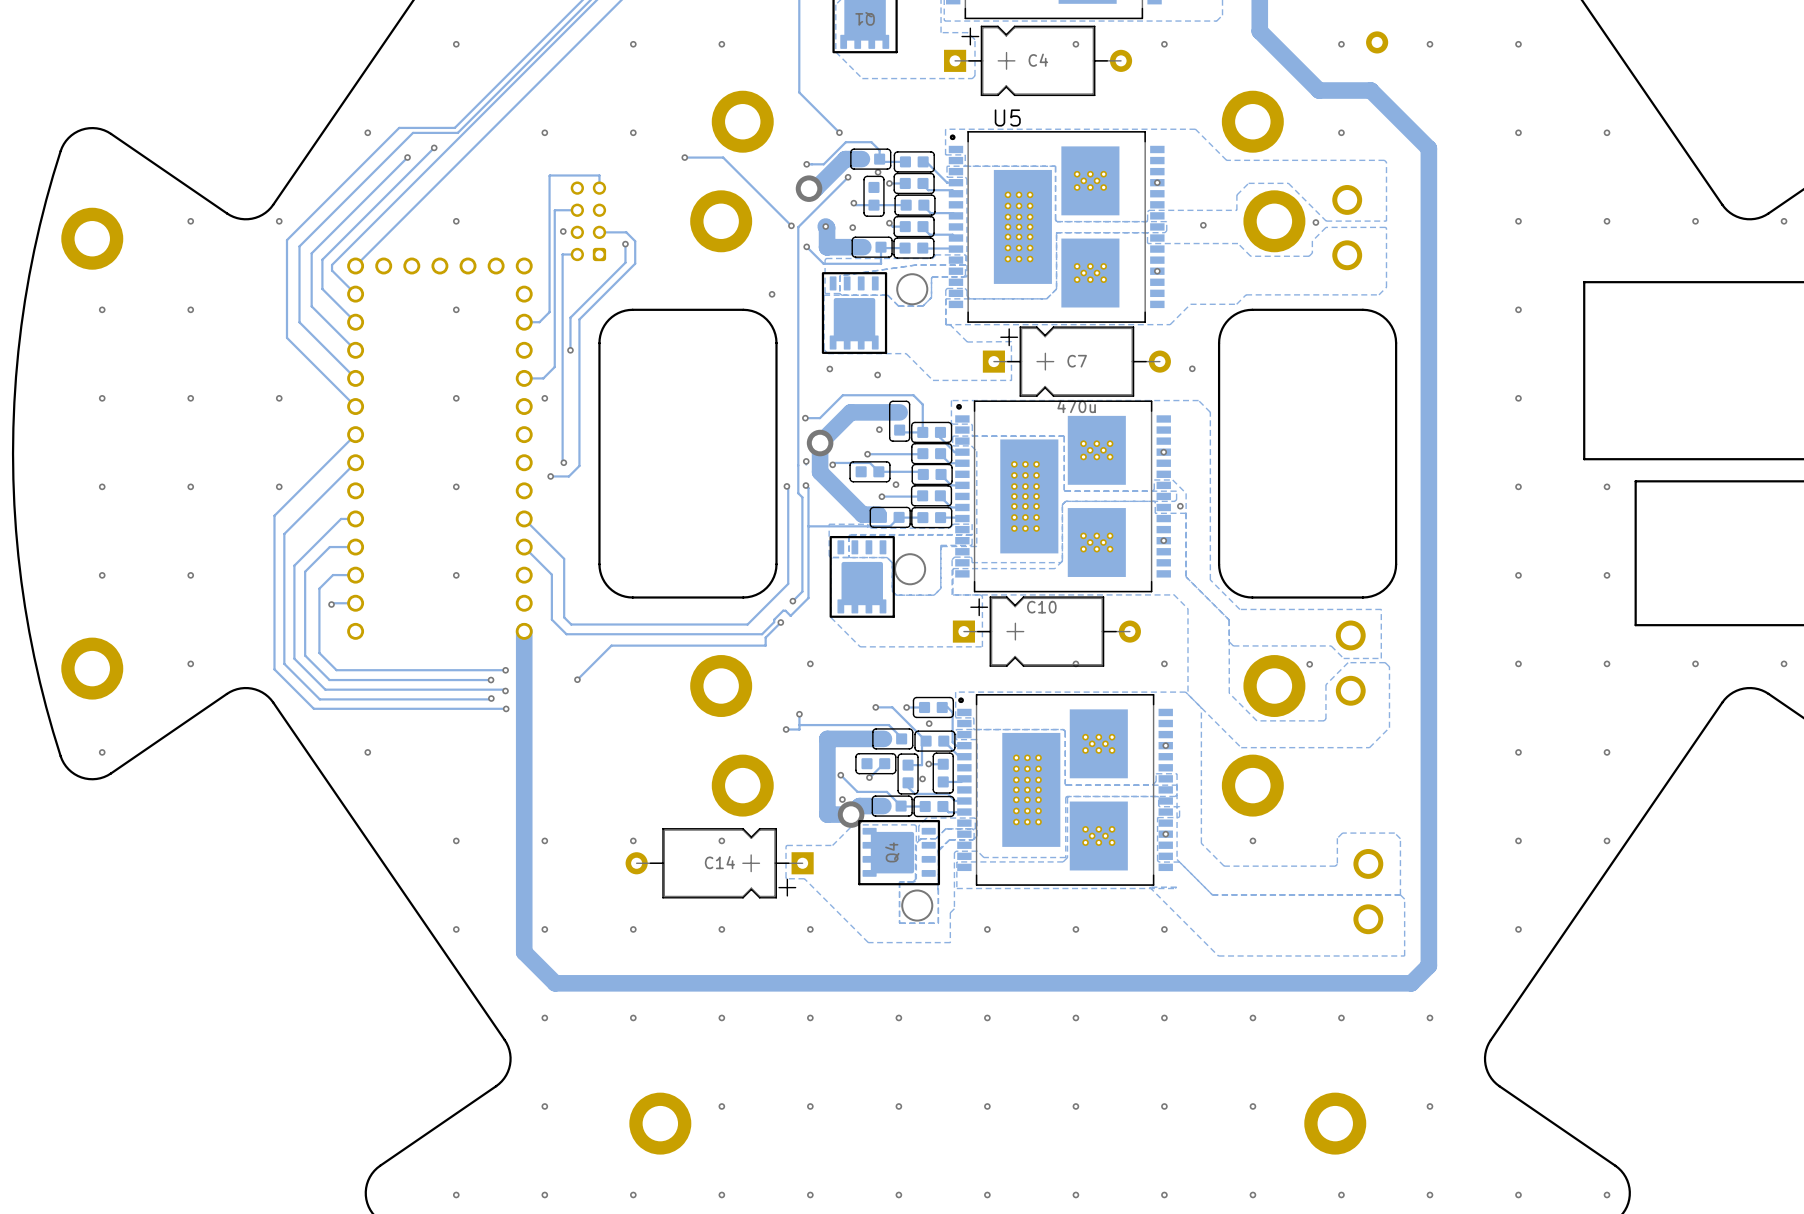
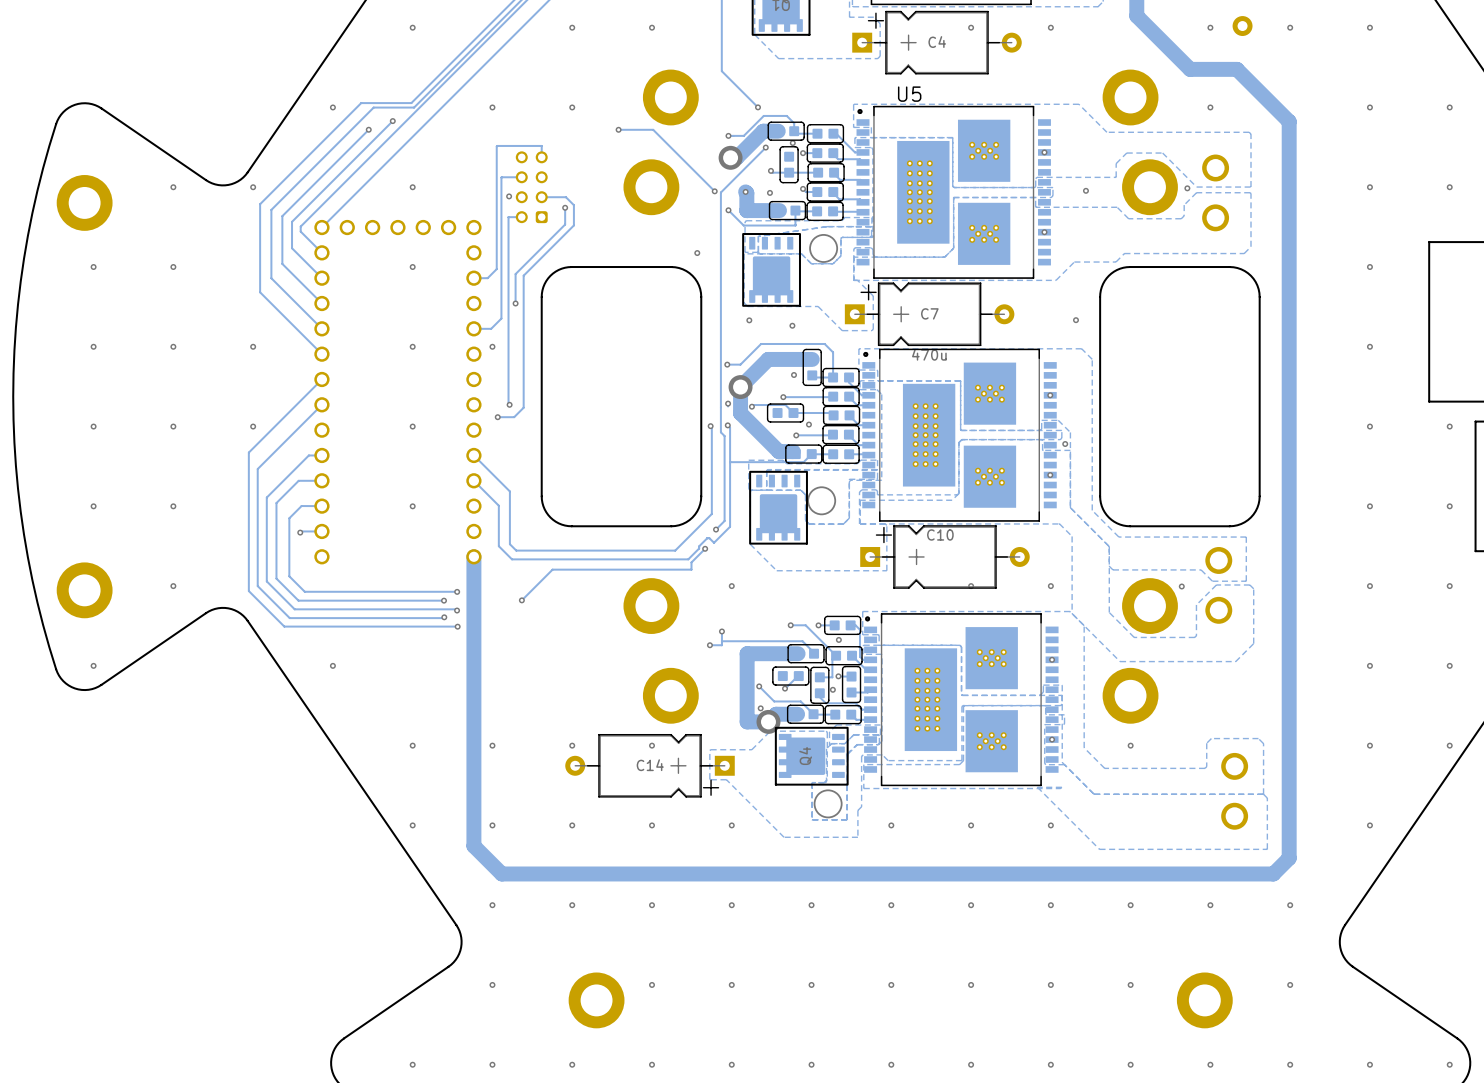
zone outline: (967, 342) (1011, 341) (1011, 380) (965, 380) -> (873, 296) (871, 330)
C7 position: (1076, 361) -> (929, 314)

